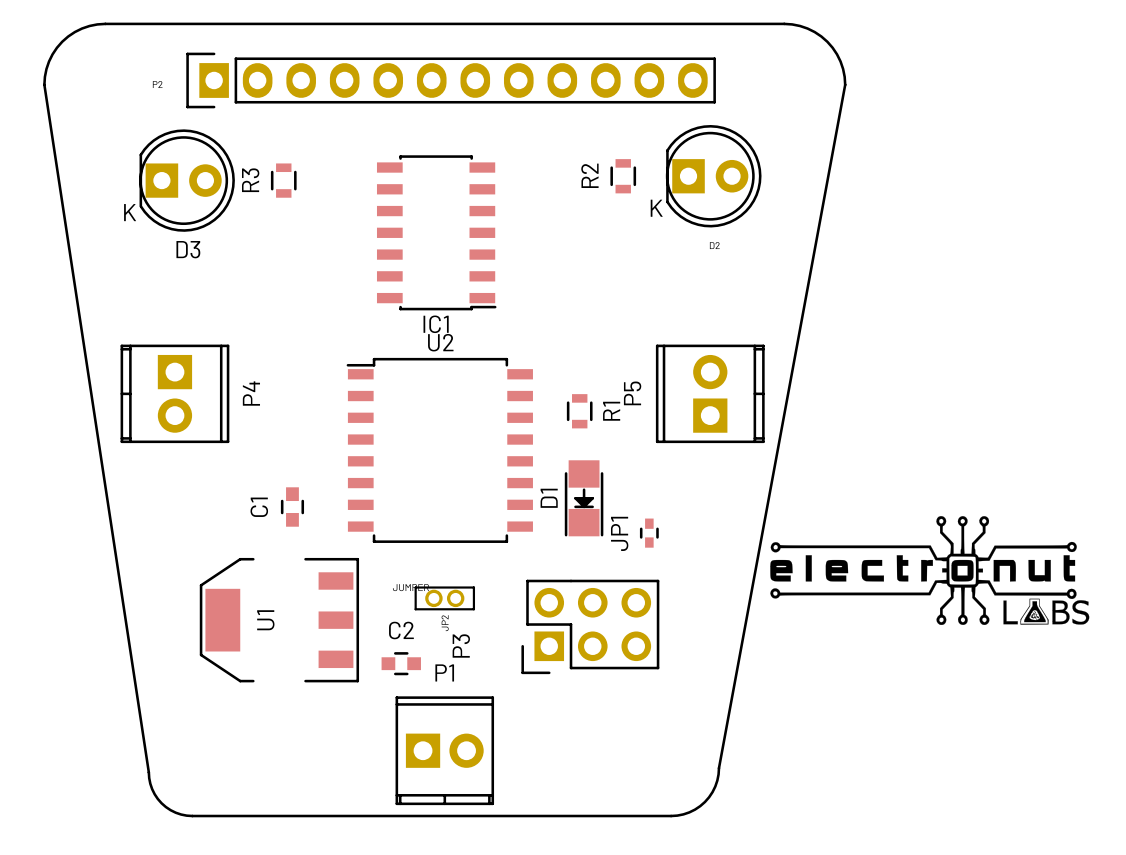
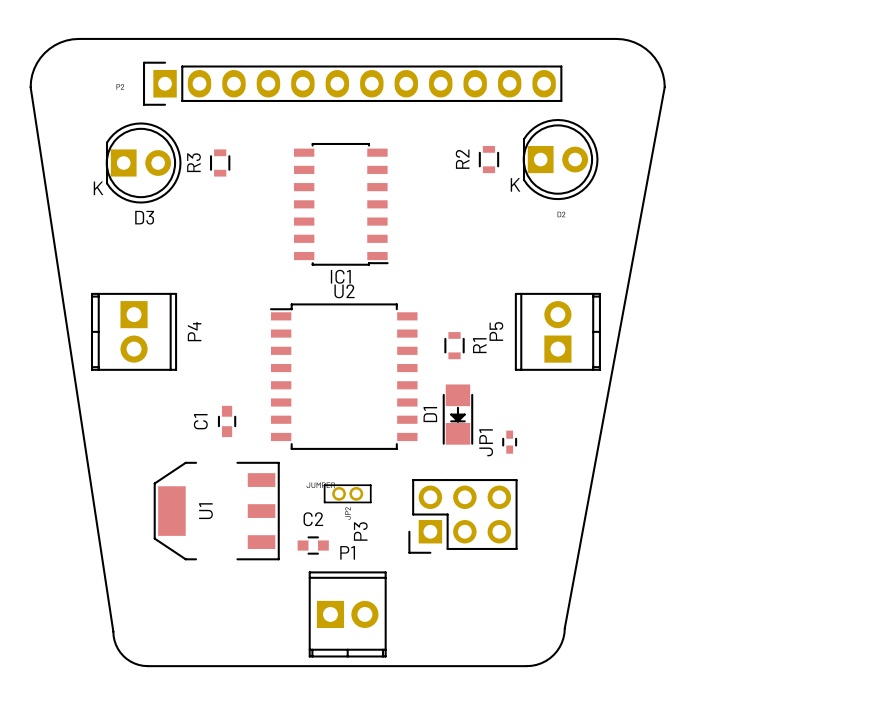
drawing: [770, 516, 1090, 625] -> none

